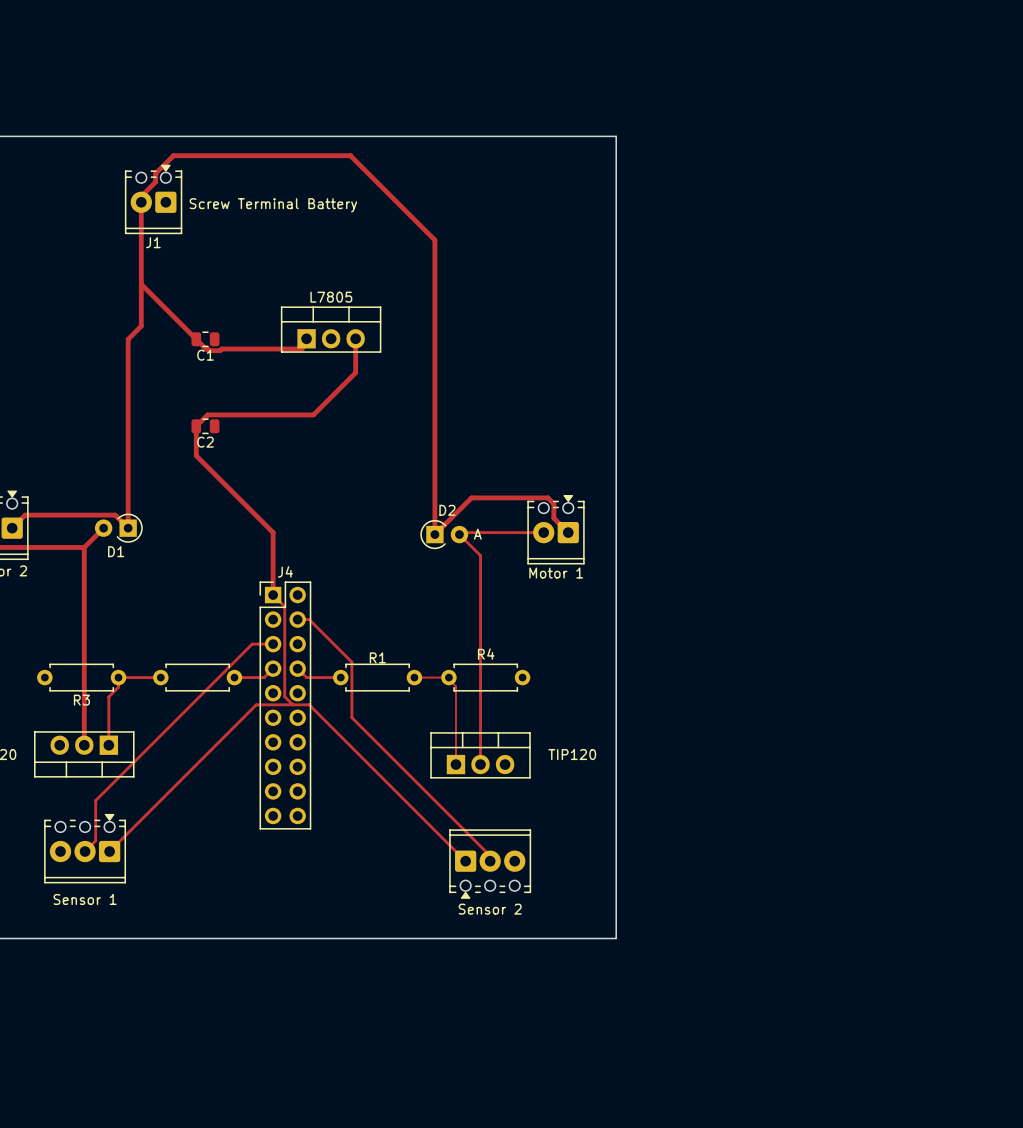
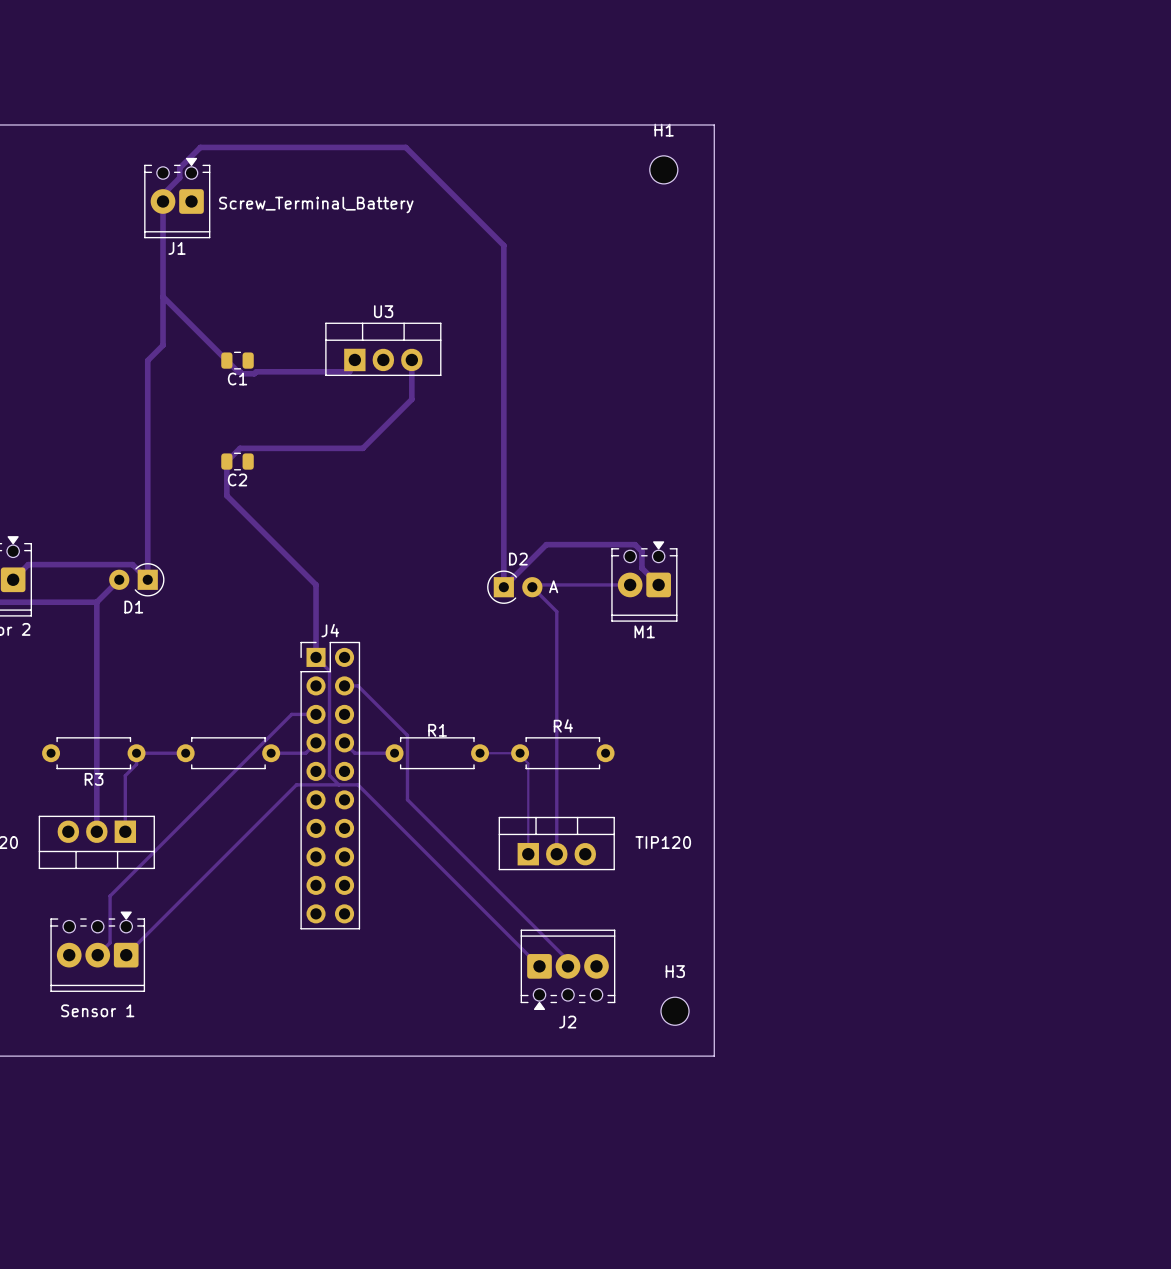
H1: none -> (663, 169)
J1 value: Screw Terminal Battery (273, 205) -> Screw_Terminal_Battery (316, 204)
L7805 name: L7805 (331, 297) -> U3 (383, 311)
Motor 1 name: Motor 1 (556, 573) -> M1 (644, 631)
H3: none -> (675, 1011)
Sensor 2 name: Sensor 2 (490, 909) -> J2 (567, 1022)

